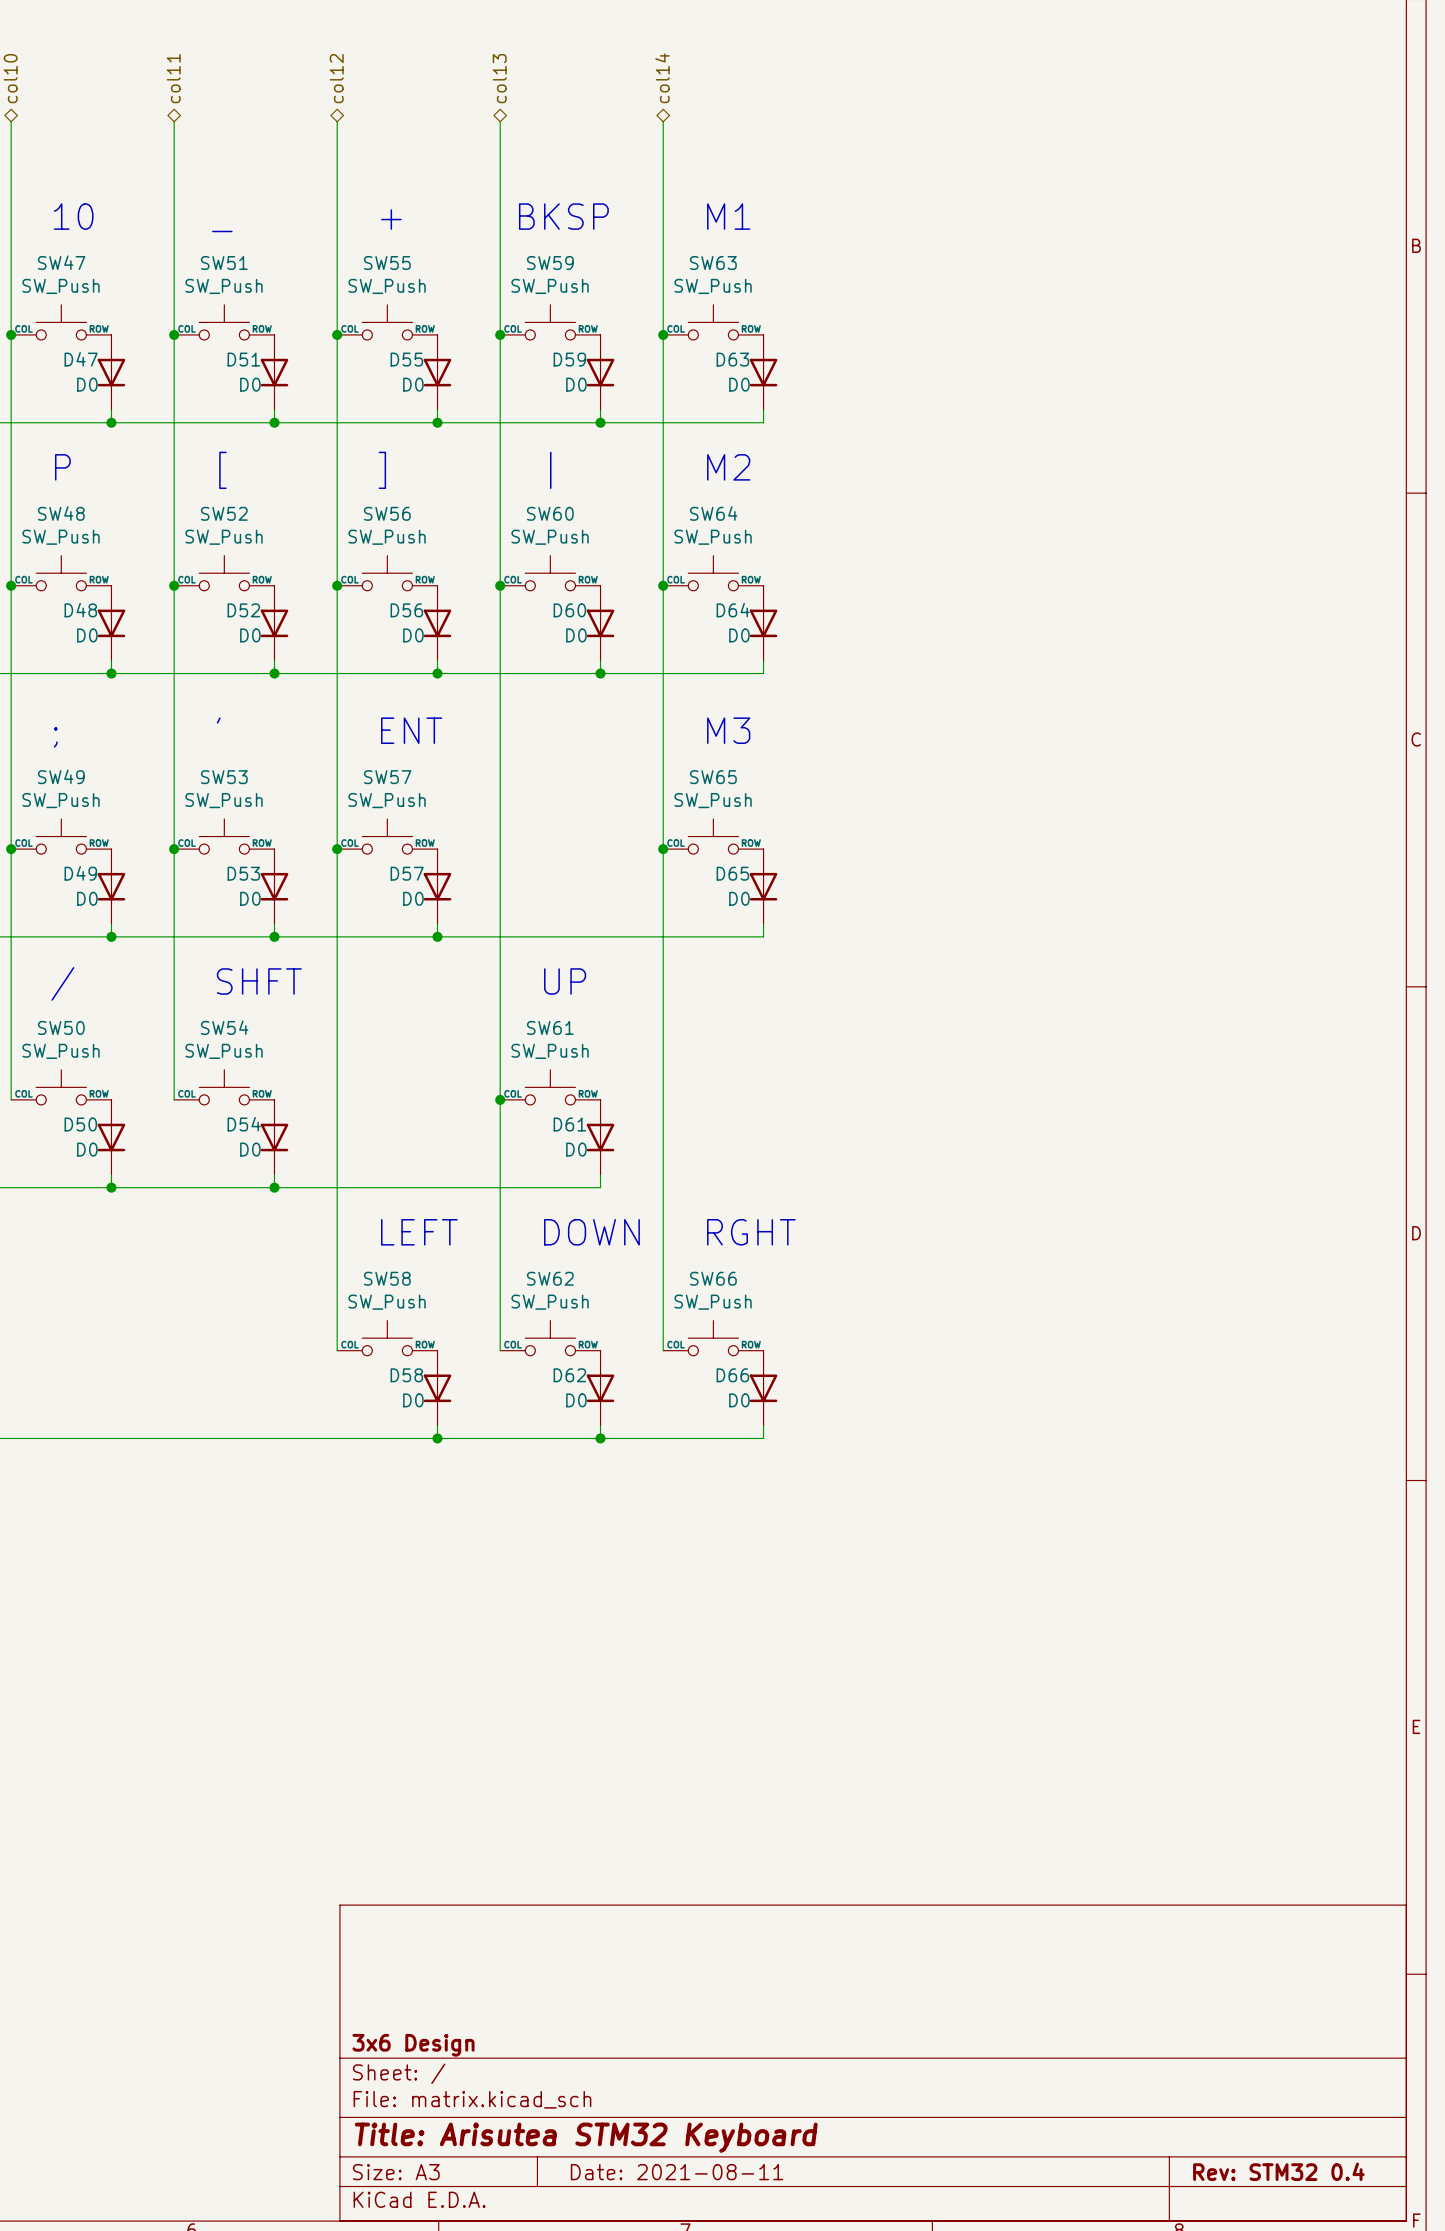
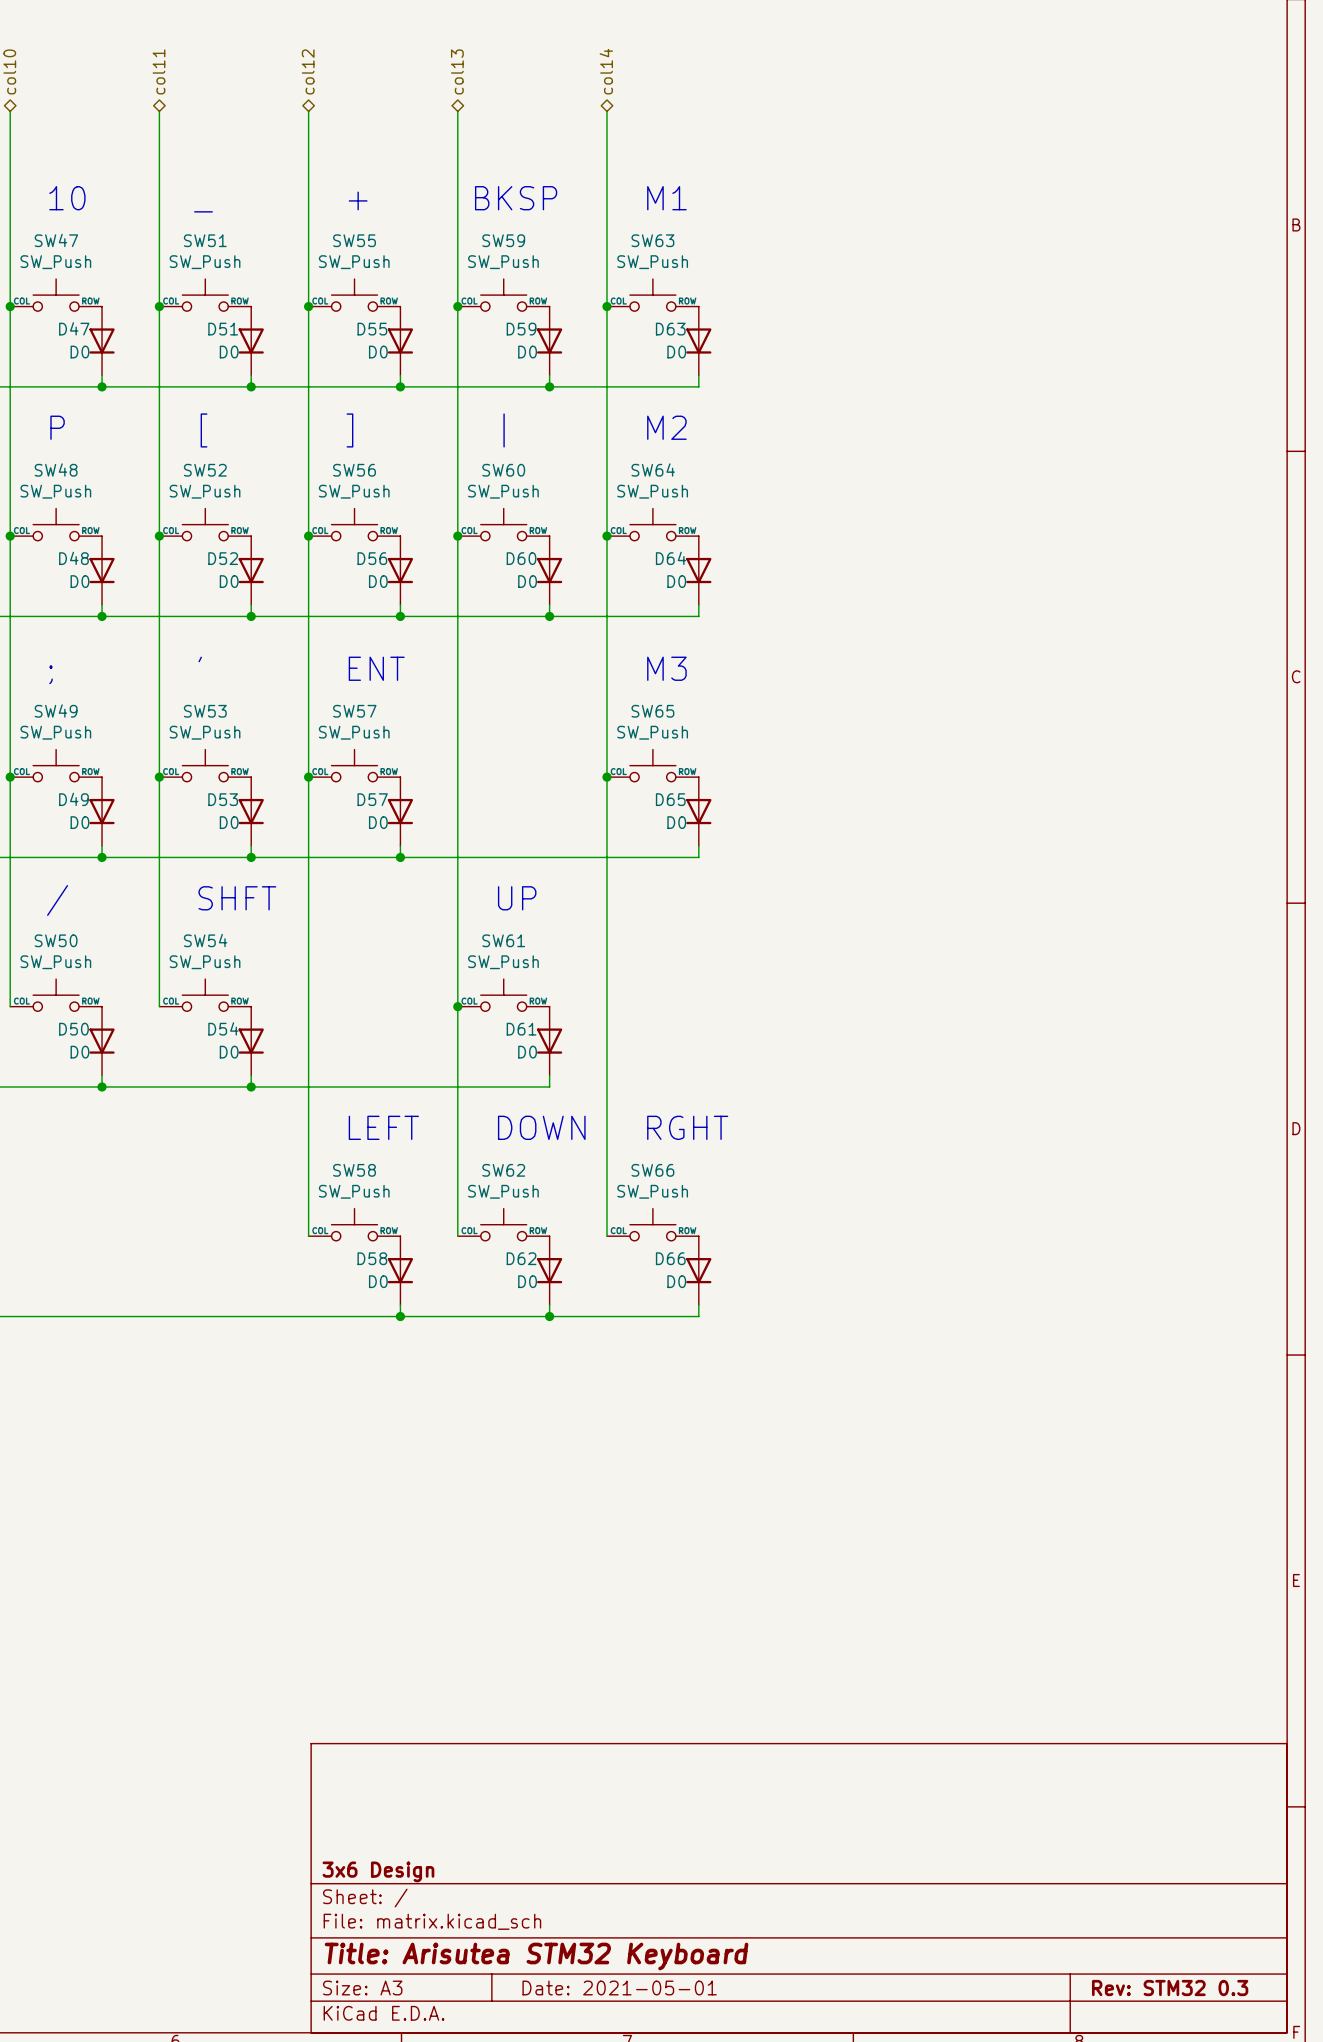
title block: Rev: STM32 0.4 (1278, 2171) -> Rev: STM32 0.3 (1170, 1988)
title block: Date: 2021-08-11 (677, 2172) -> Date: 2021-05-01 (619, 1988)

